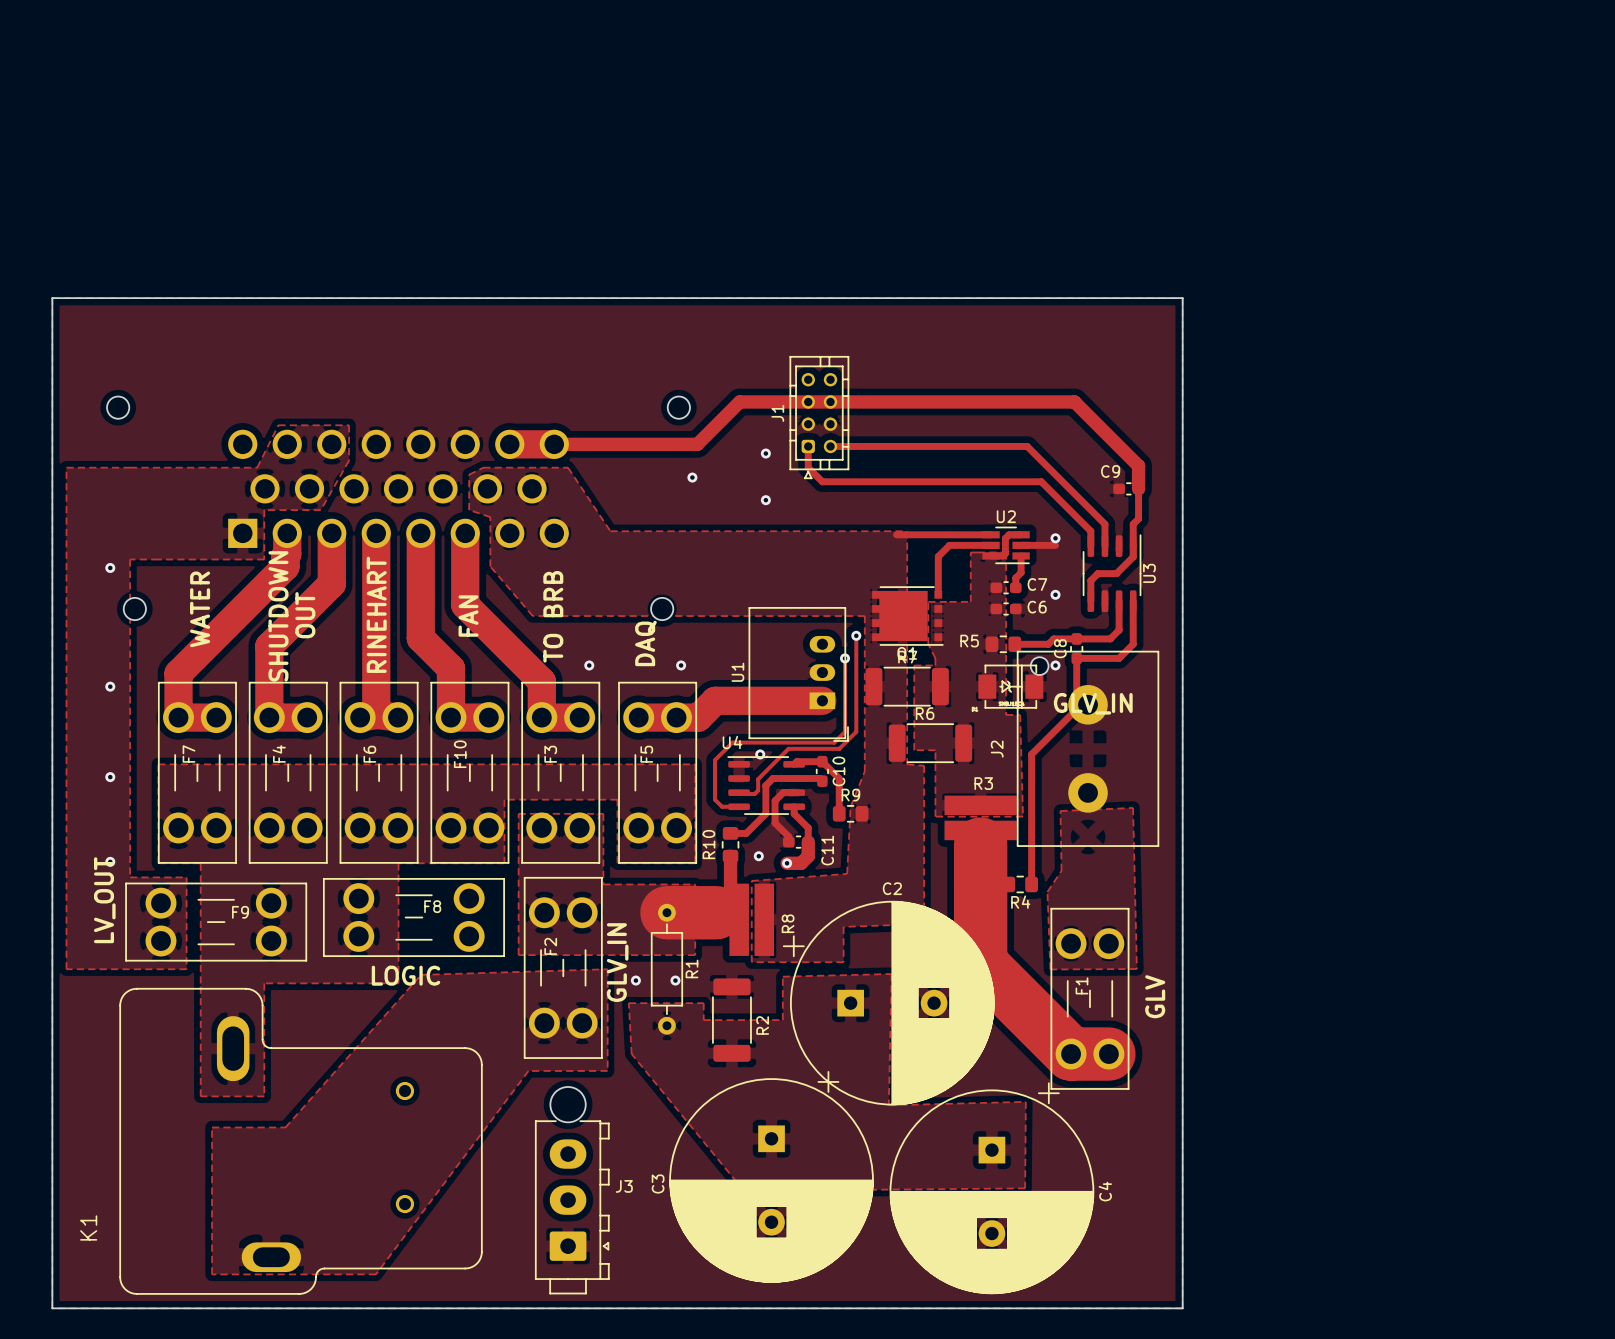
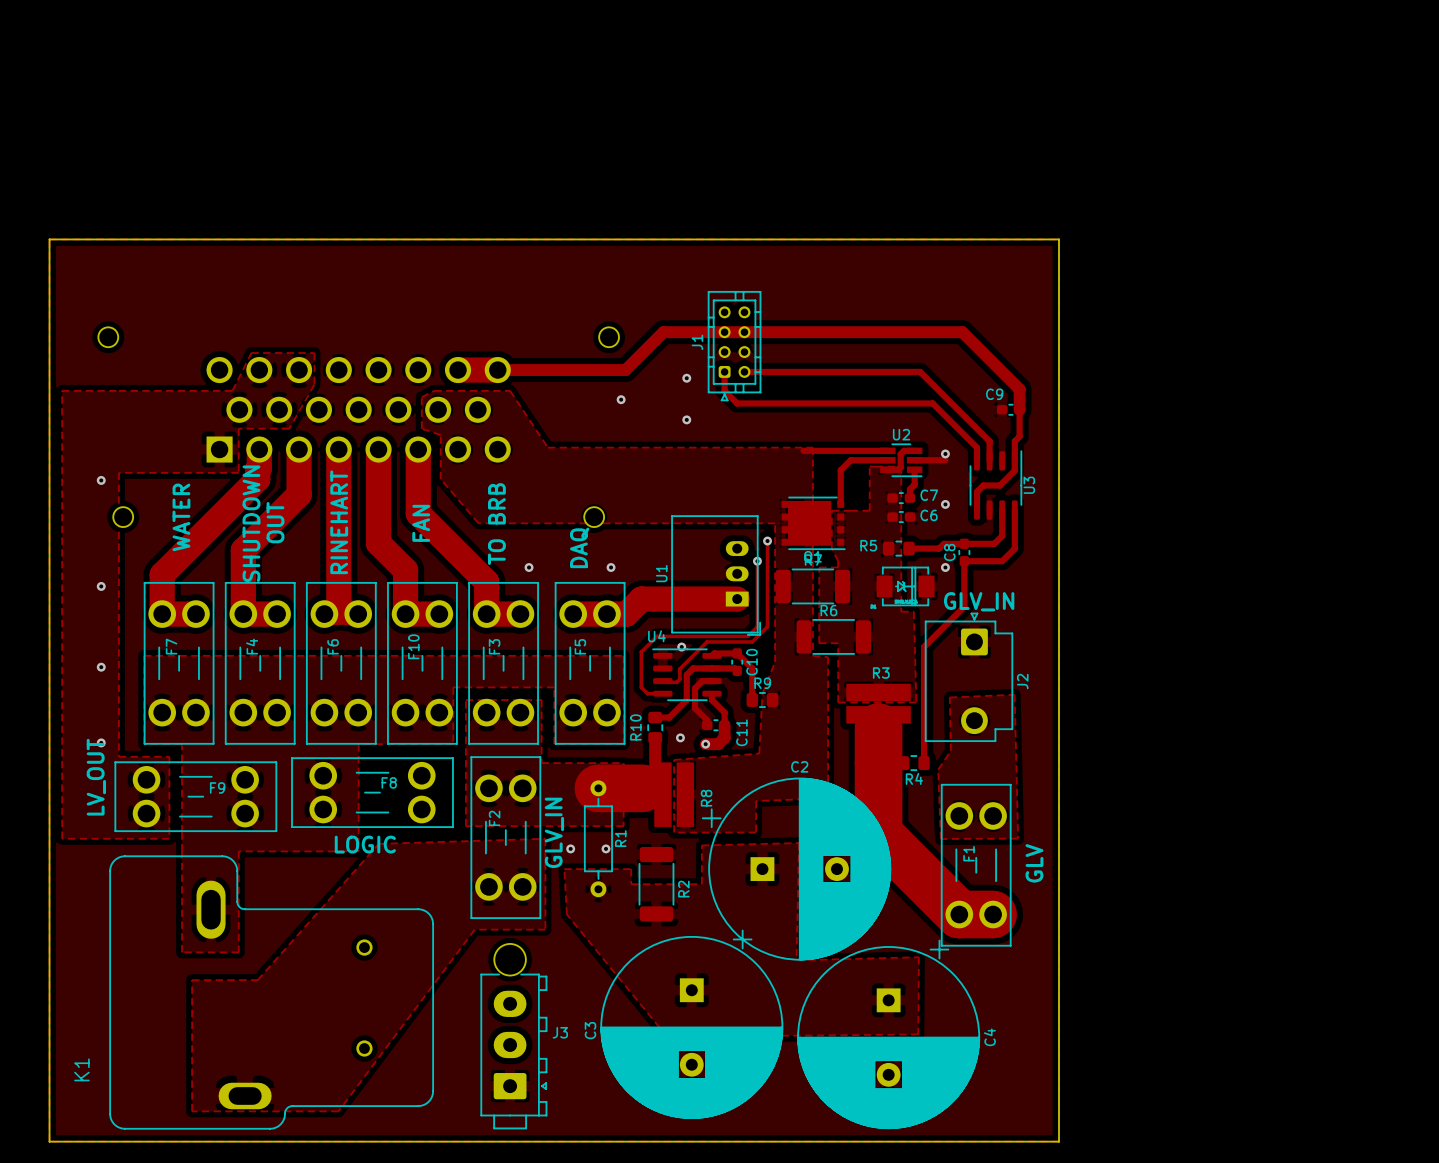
J2 footprint: [1016, 650, 1160, 847] -> [925, 612, 1013, 742]
J2 name position: J2 (997, 749) -> J2 (1022, 681)

